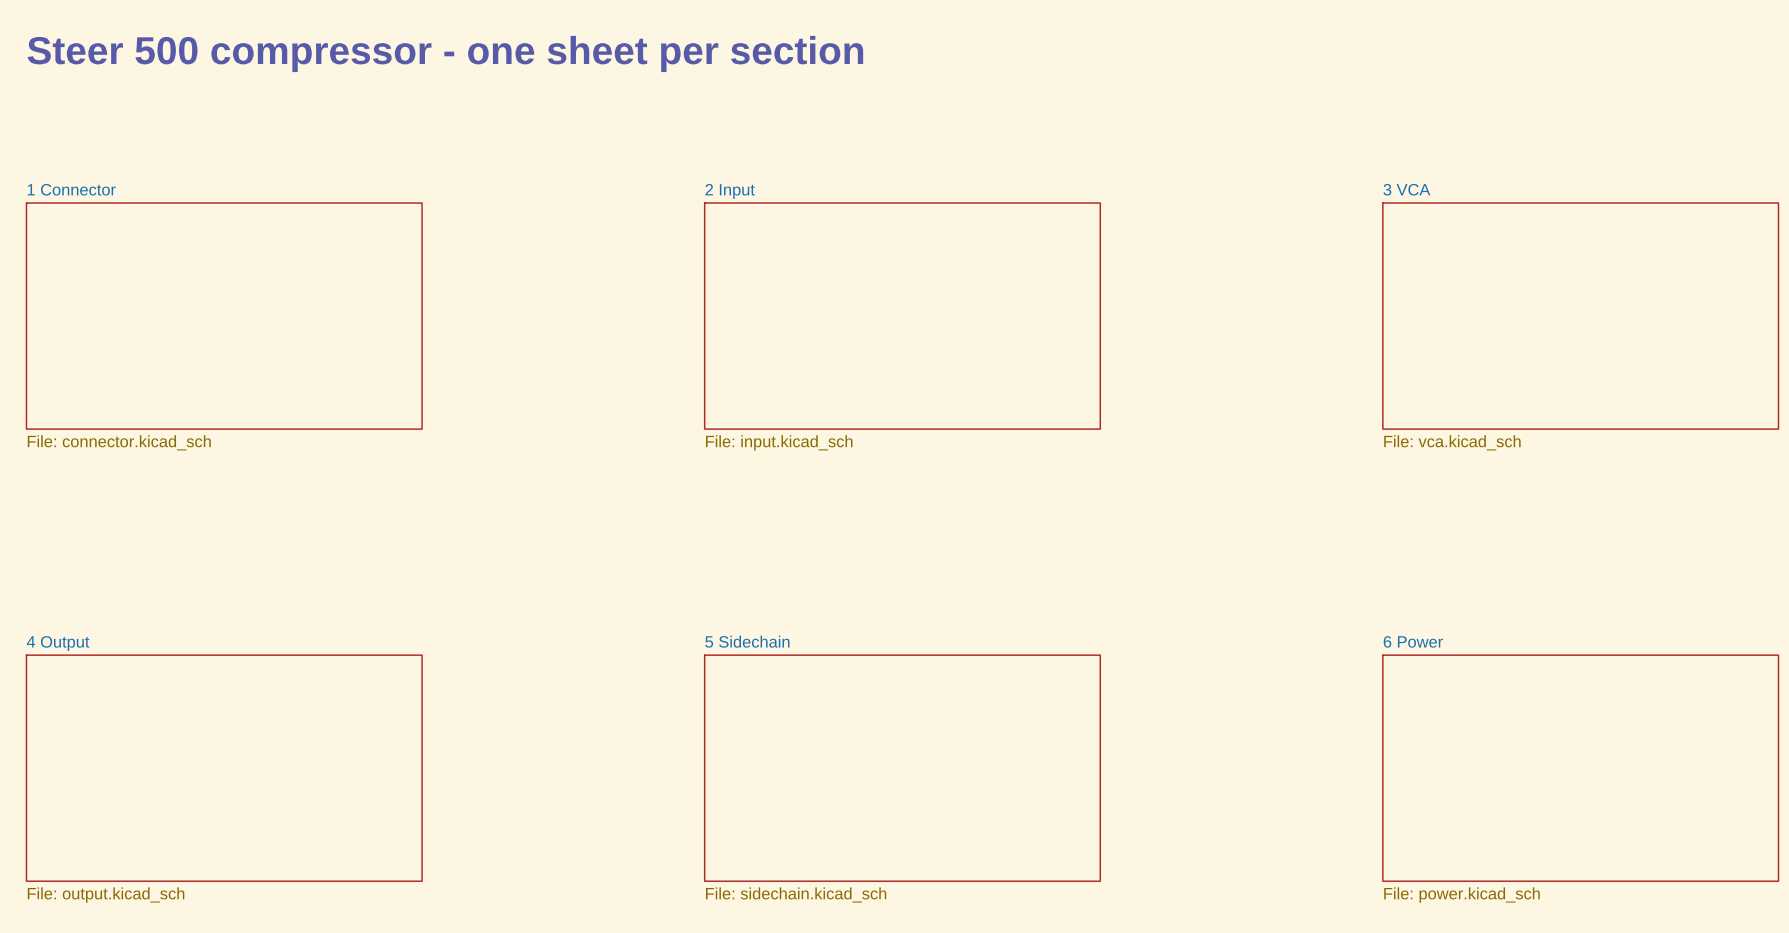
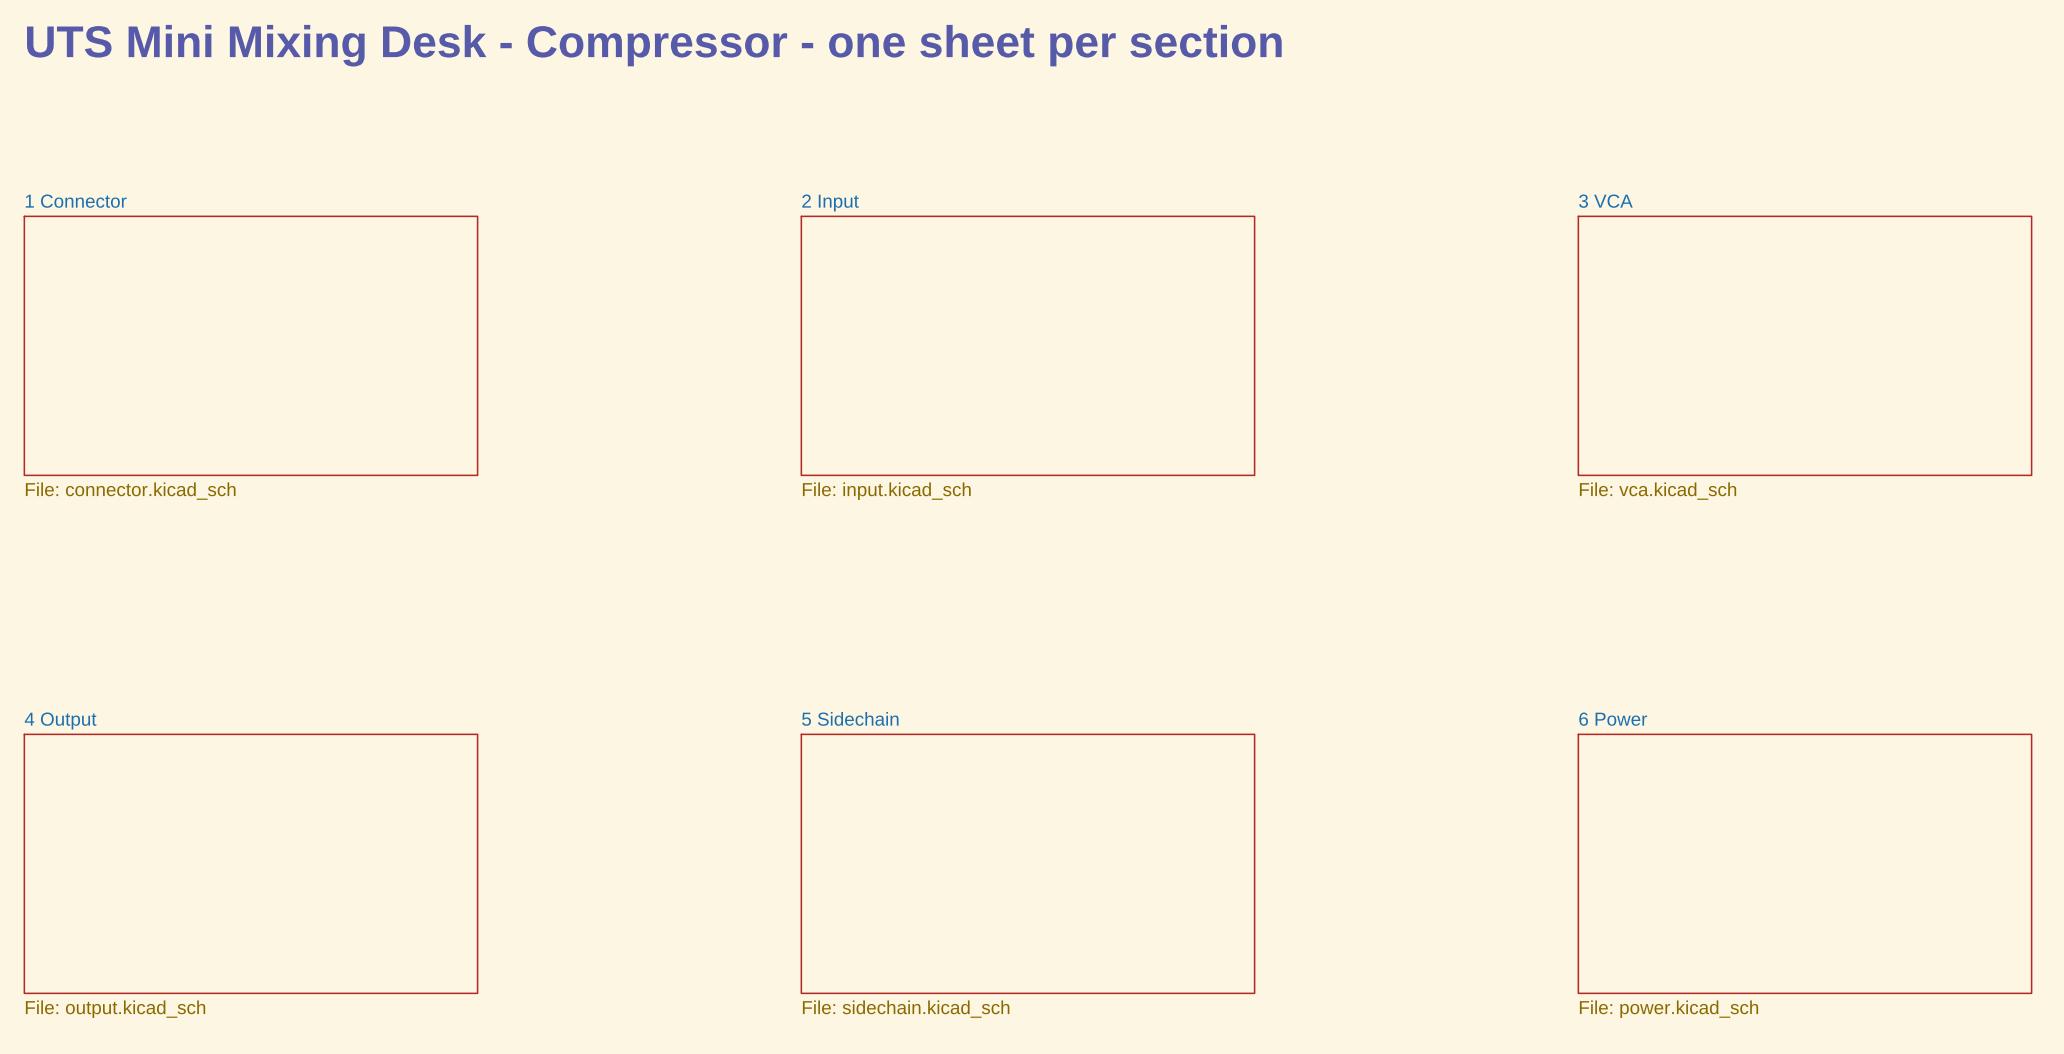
text: Steer 500 compressor - one sheet per section (445, 53) -> UTS Mini Mixing Desk - Compressor - one sheet per section (654, 45)

